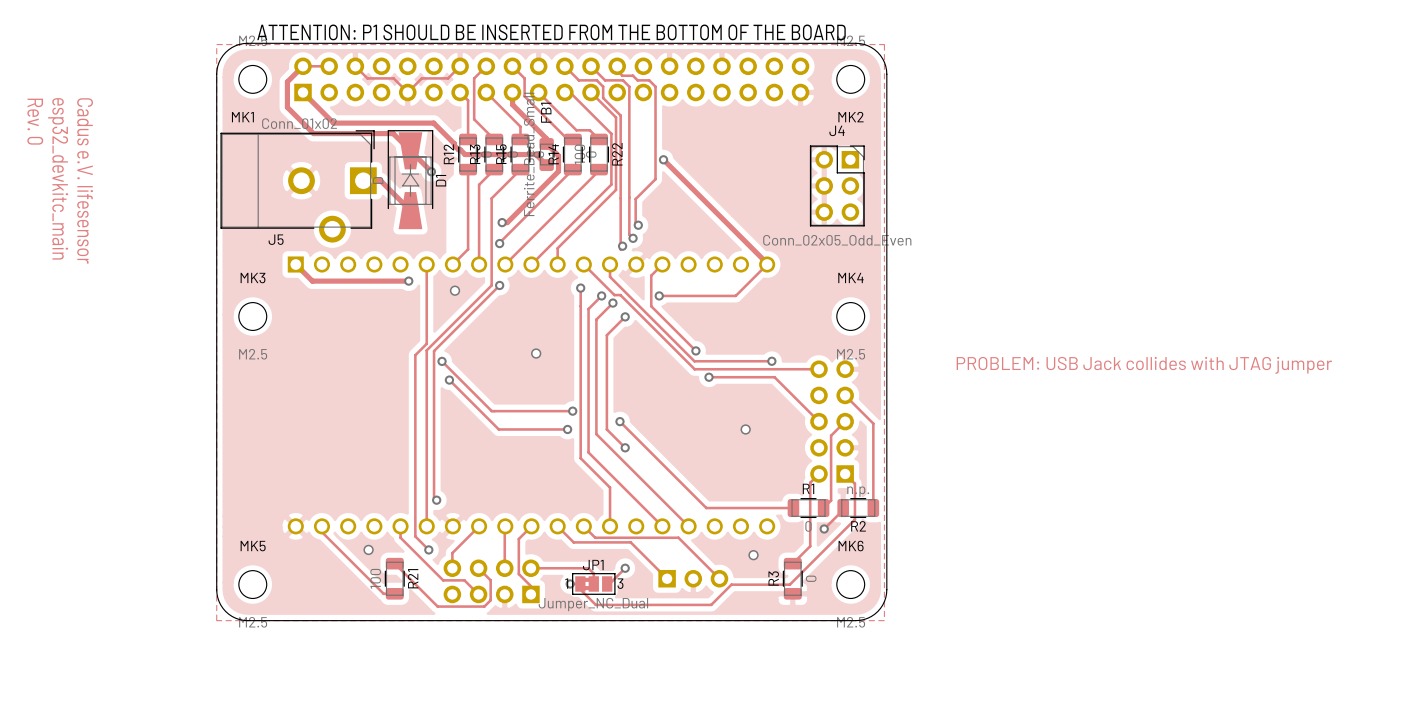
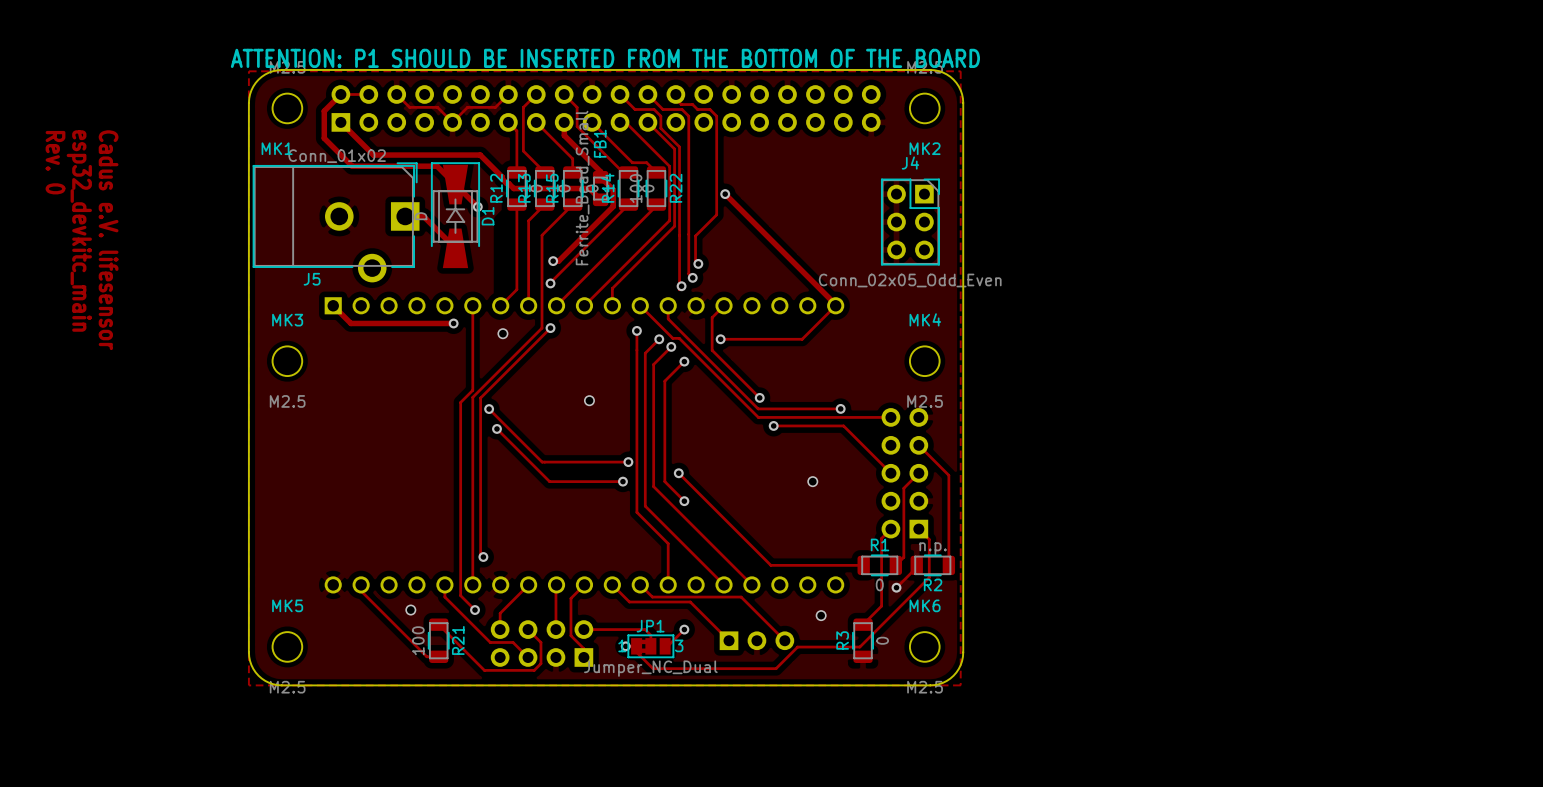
text: PROBLEM: USB Jack collides with JTAG jumper (1144, 365) -> none

